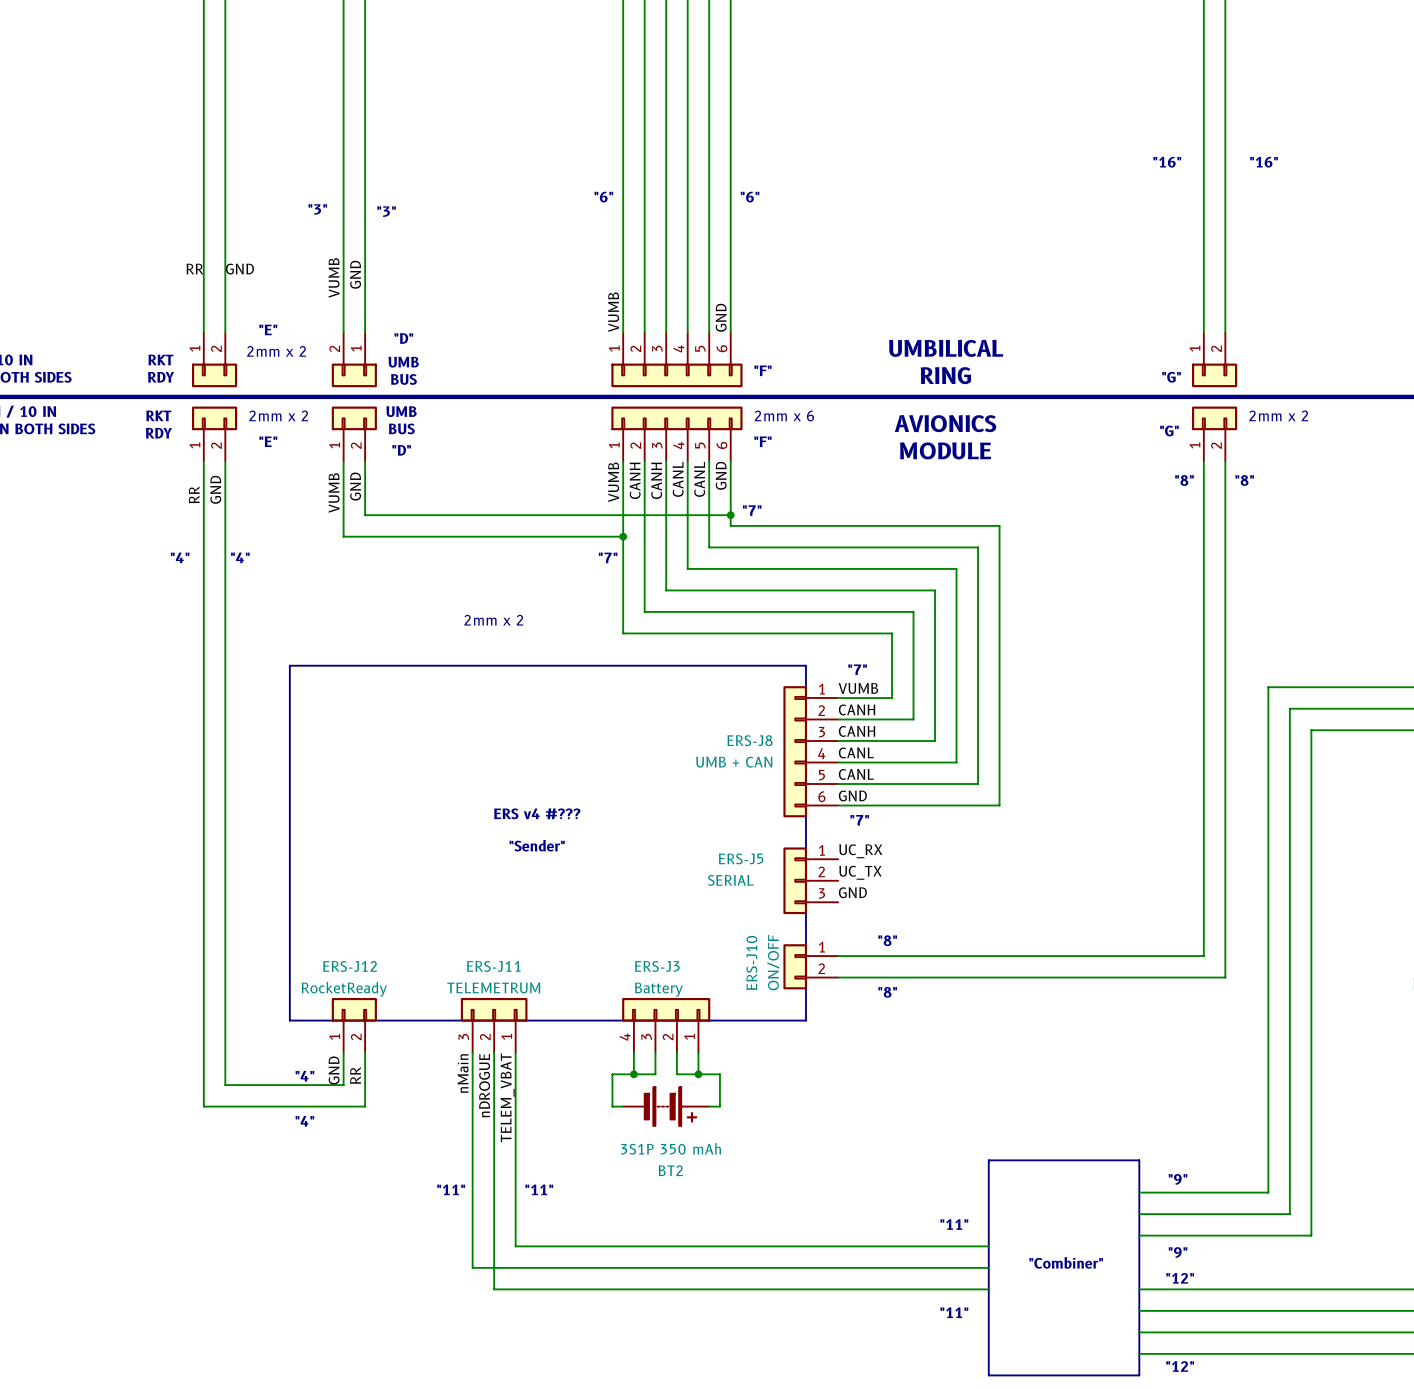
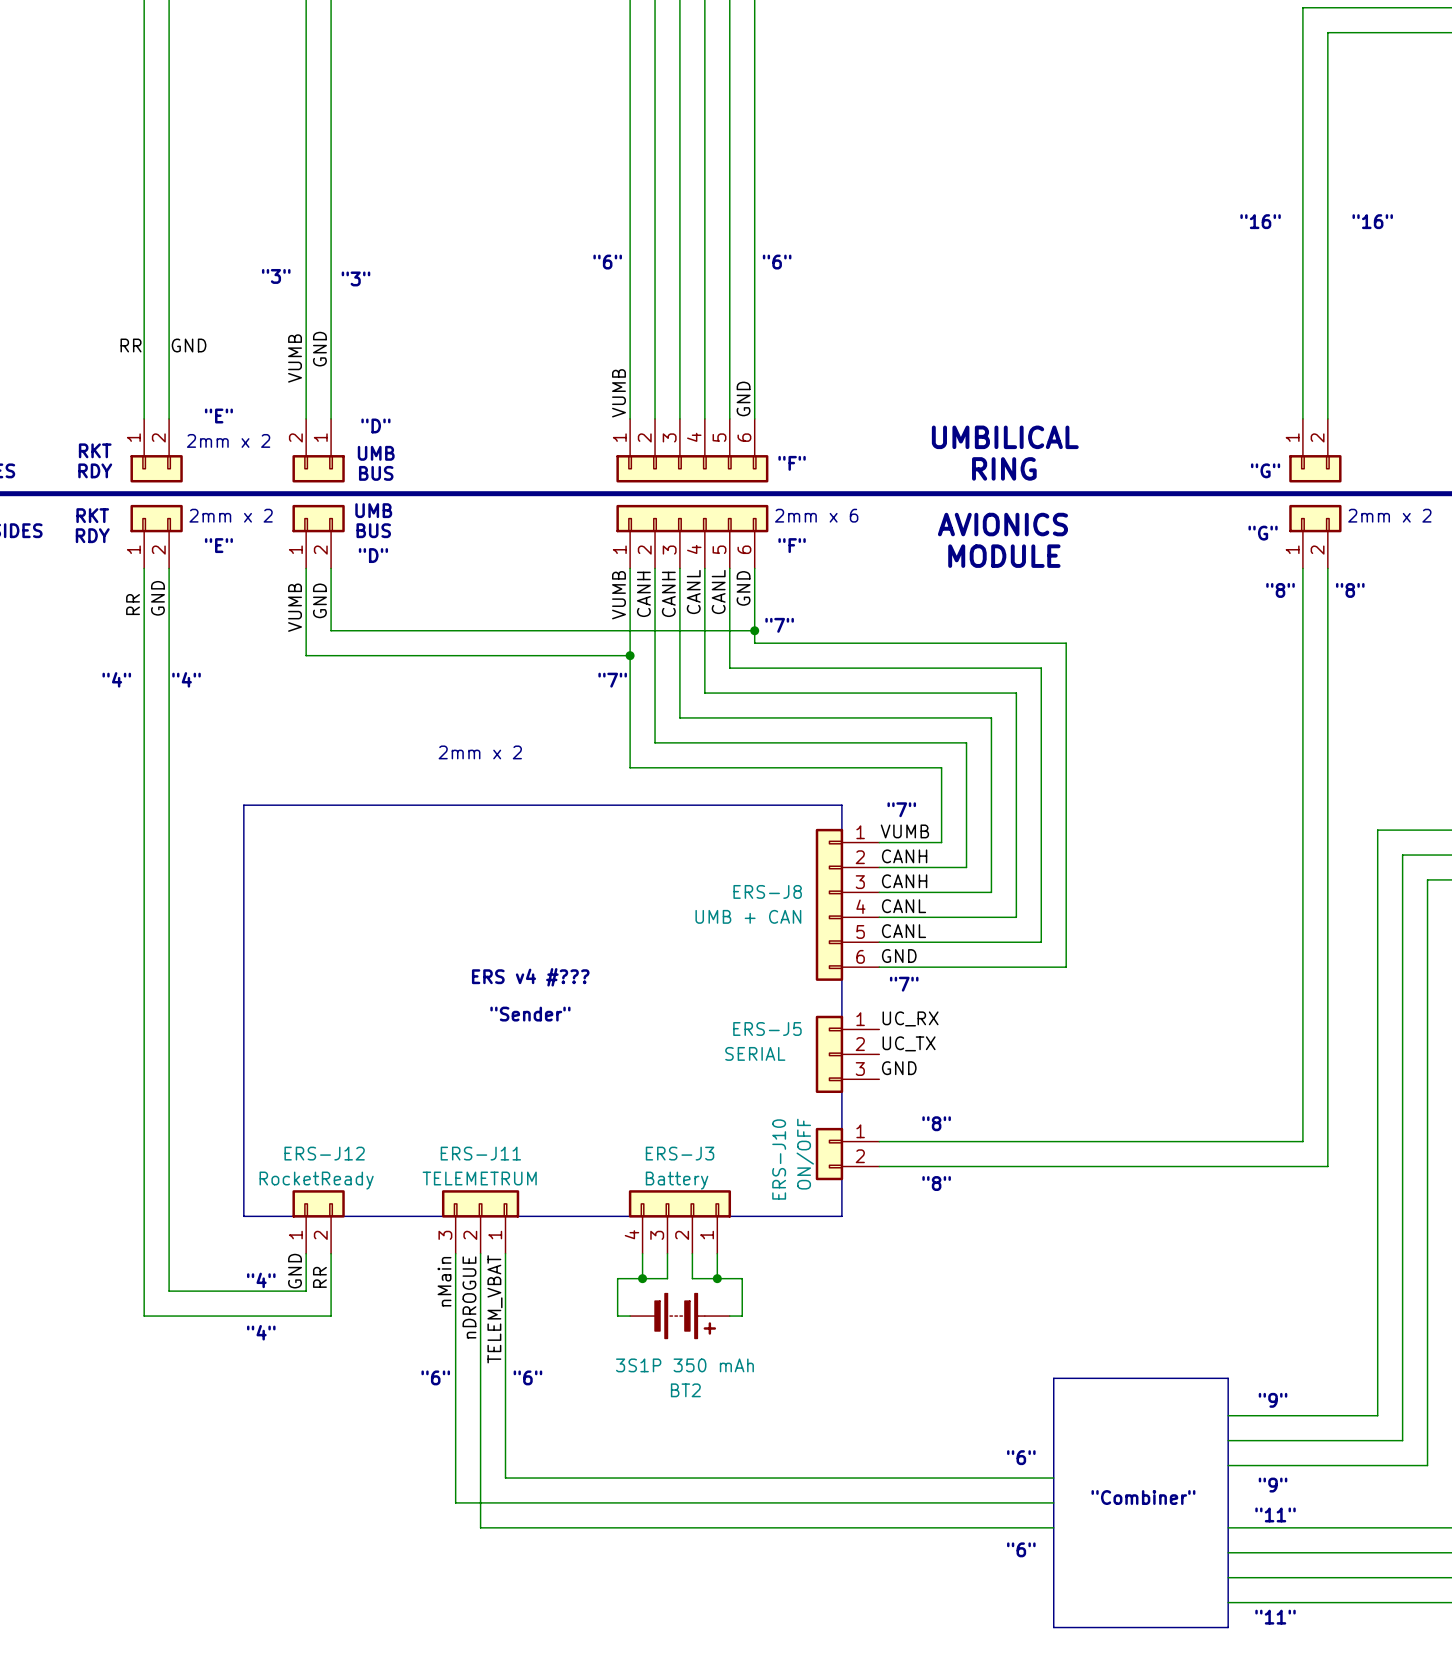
text: none -> "6" (435, 1377)
text: none -> "6" (527, 1377)
text: "11" (451, 1189) -> none
text: "11" (539, 1189) -> none
text: "11" (954, 1224) -> "6" (1021, 1457)
text: "12" (1180, 1278) -> "11" (1275, 1514)
text: "11" (954, 1312) -> "6" (1021, 1549)
text: "12" (1180, 1366) -> "11" (1275, 1617)

